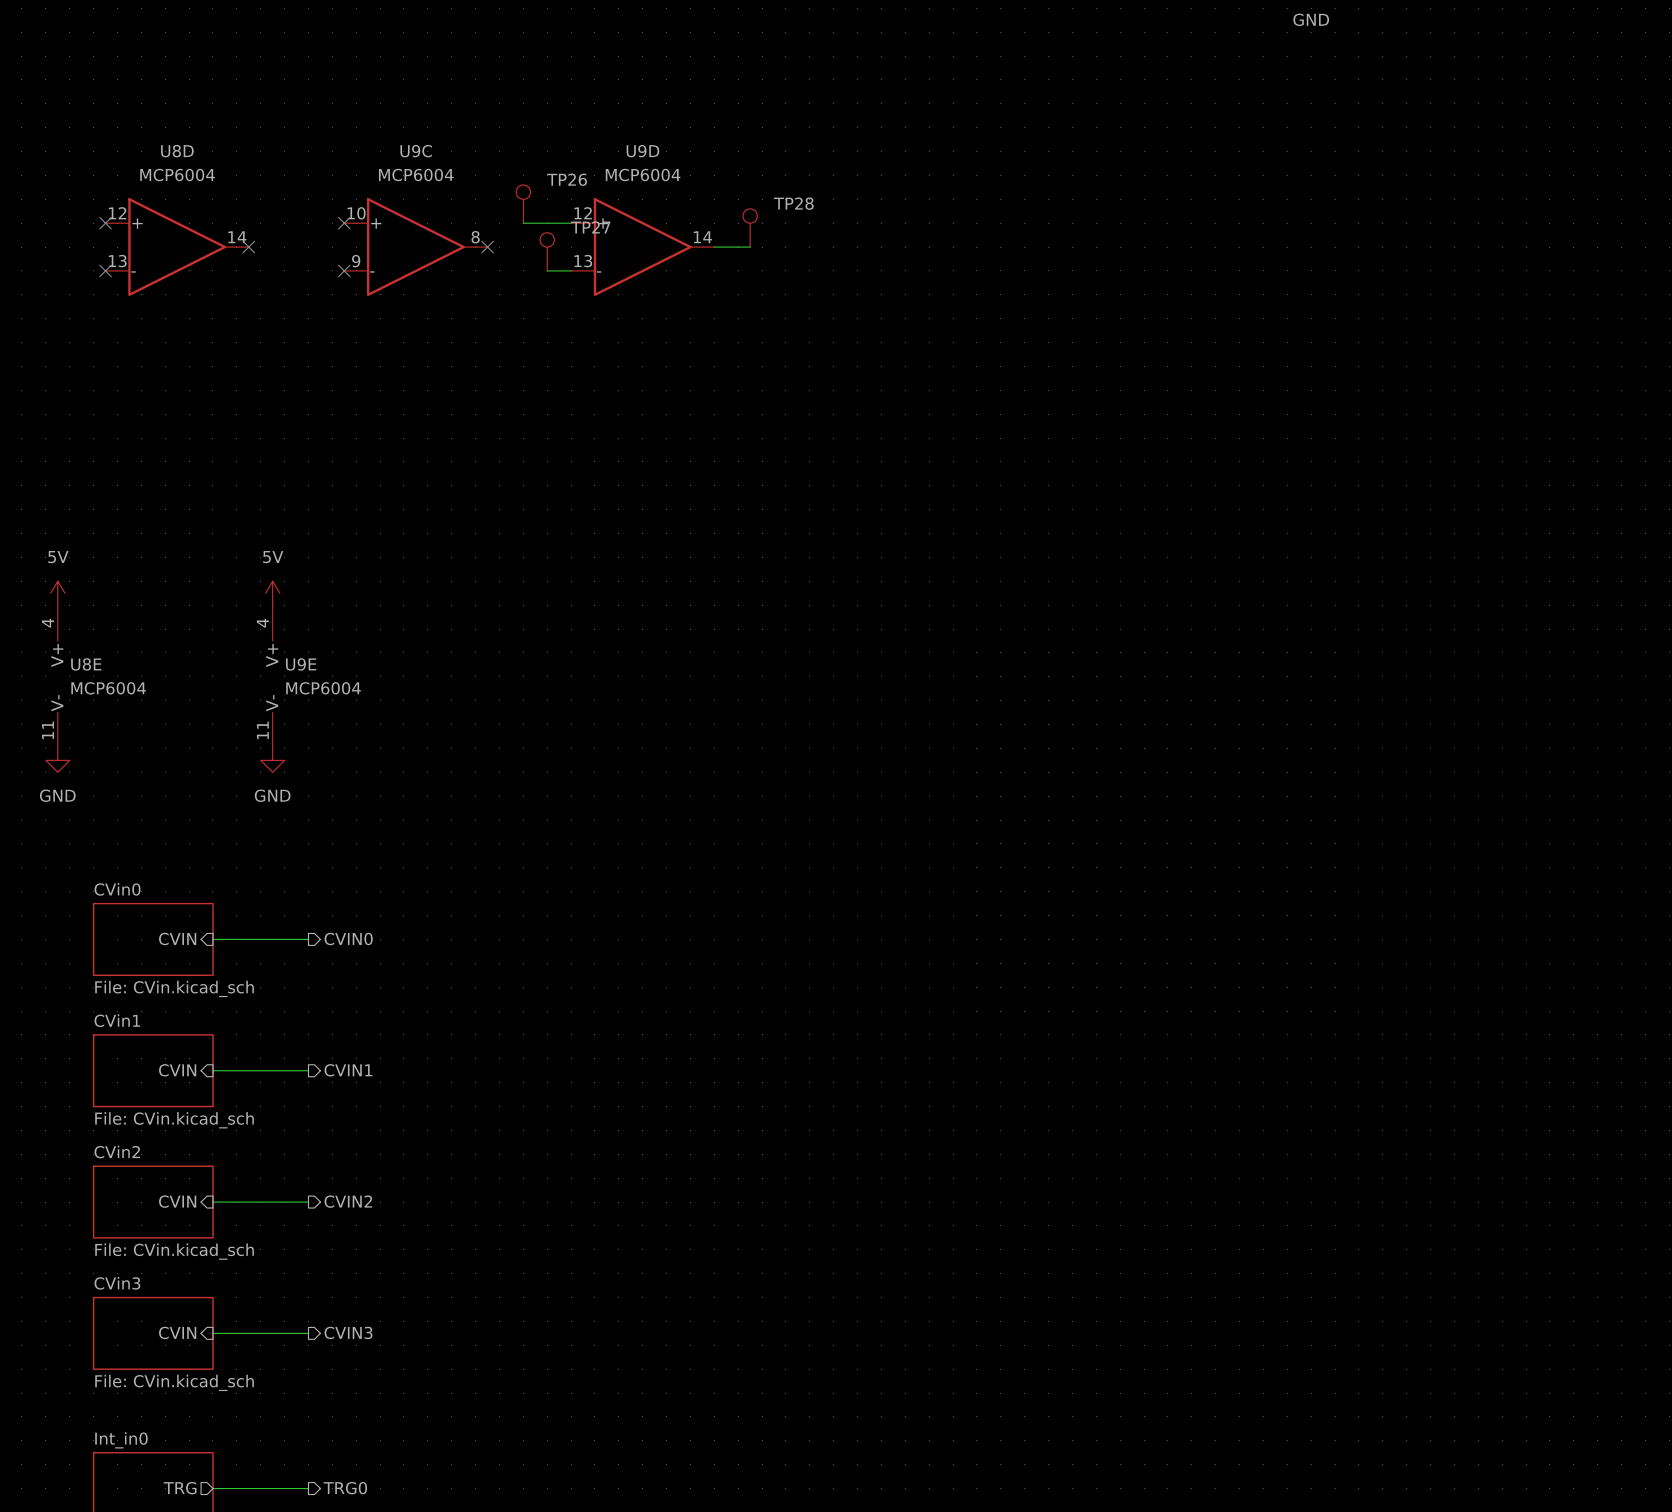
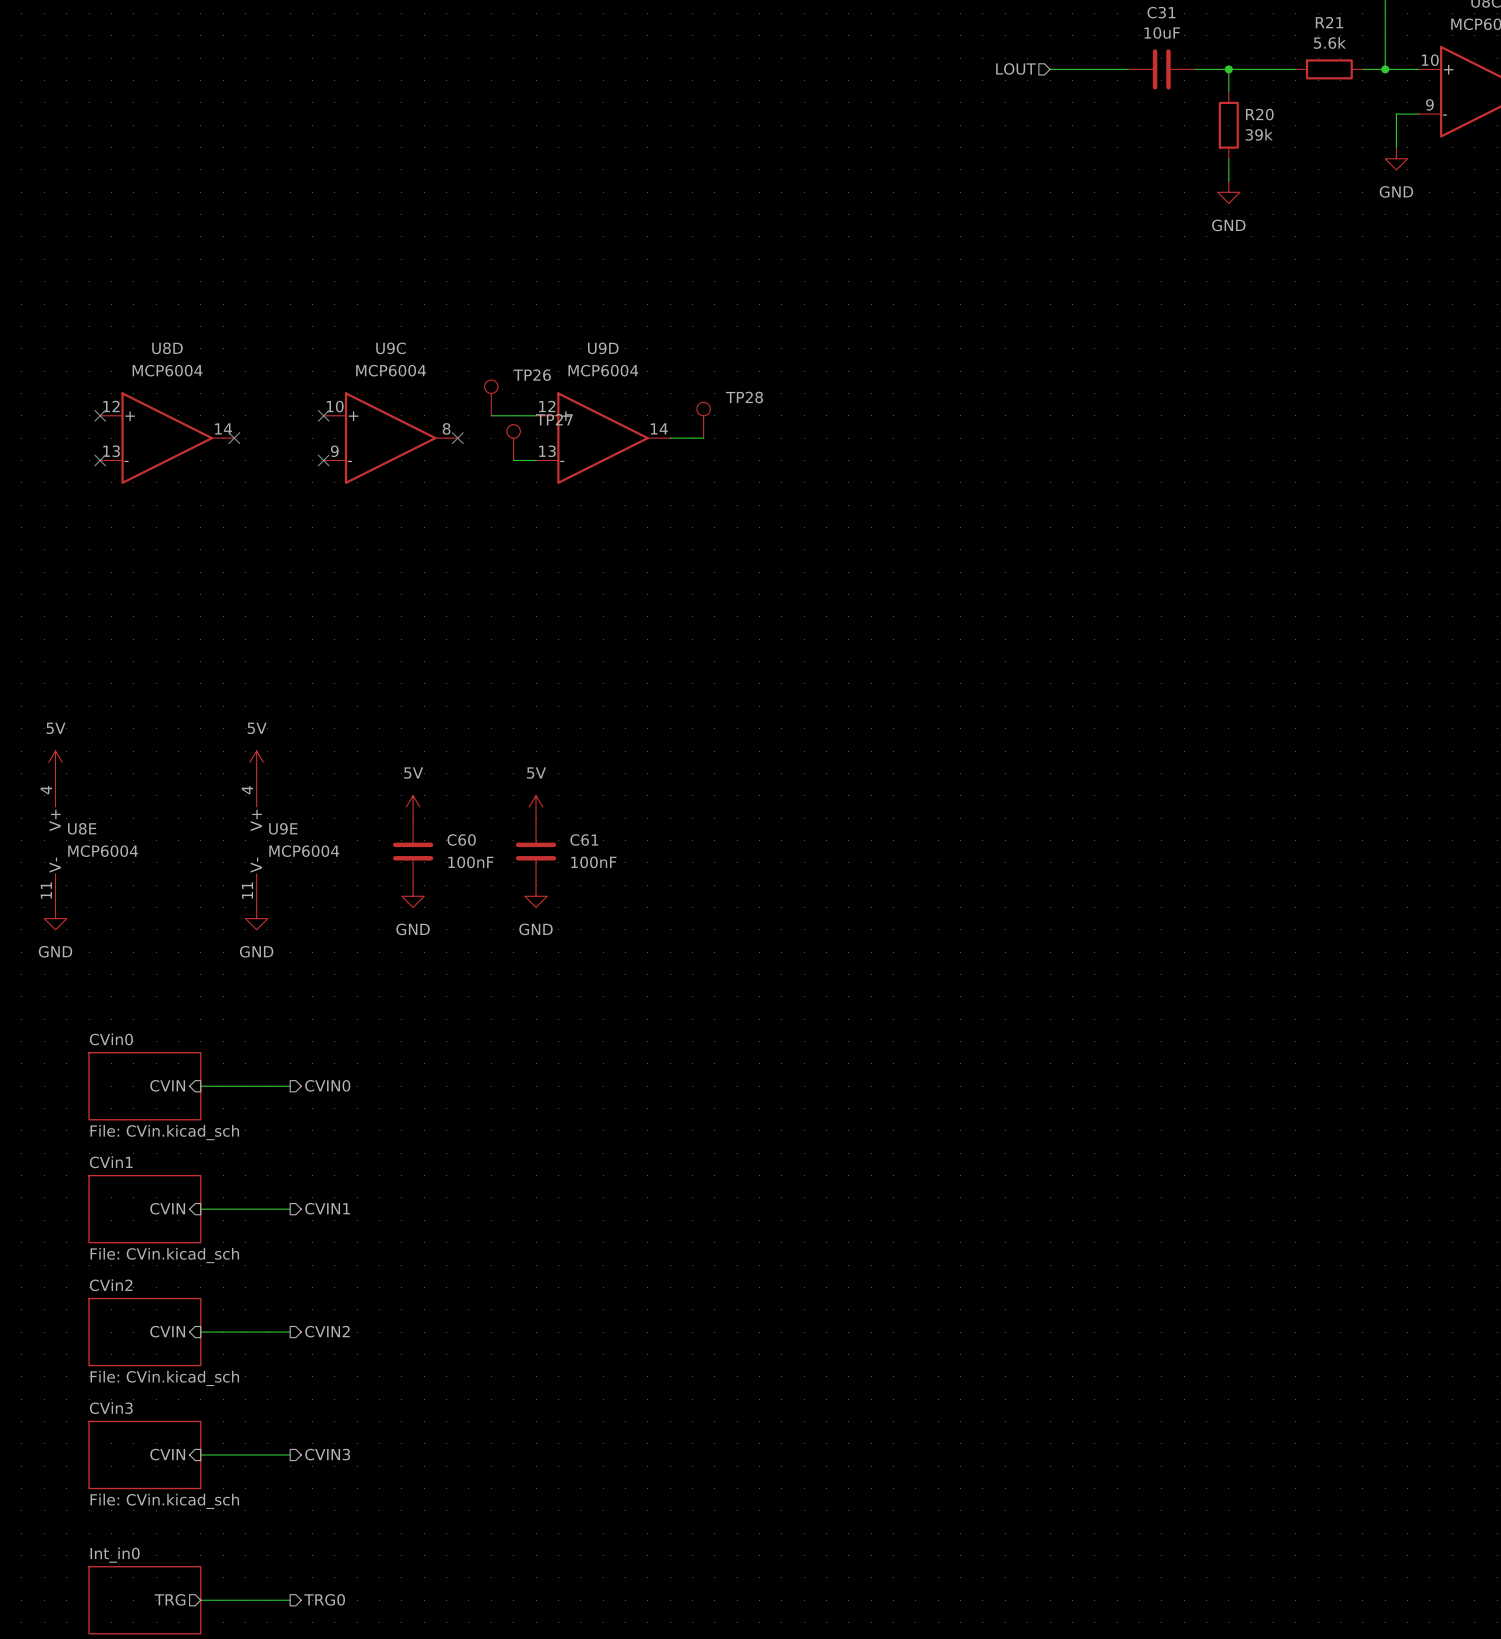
power symbol: none -> 5V (413, 806)
power symbol: none -> 5V (536, 806)
C60: none -> 100nF (413, 851)
C61: none -> 100nF (536, 851)
power symbol: none -> GND (413, 896)
power symbol: none -> GND (536, 896)

